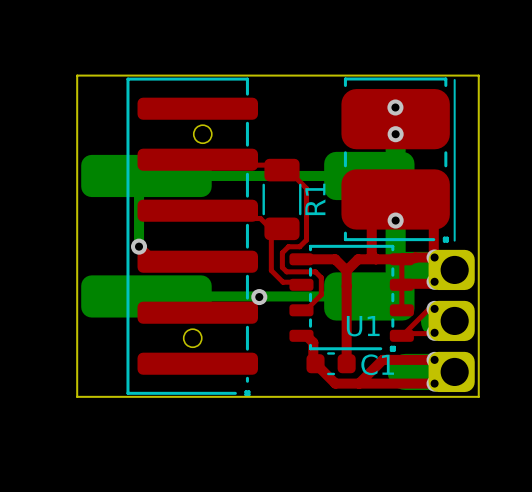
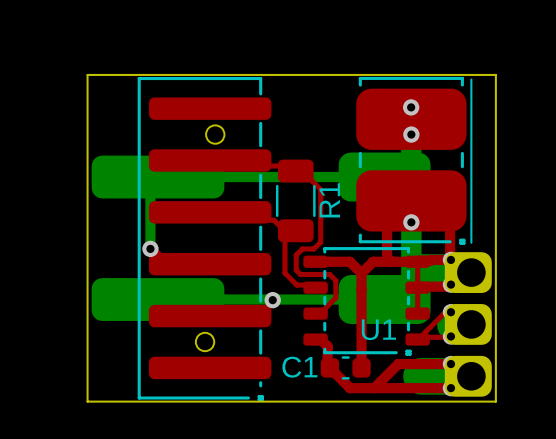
C1 name position: C1 (377, 364) -> C1 (299, 367)

